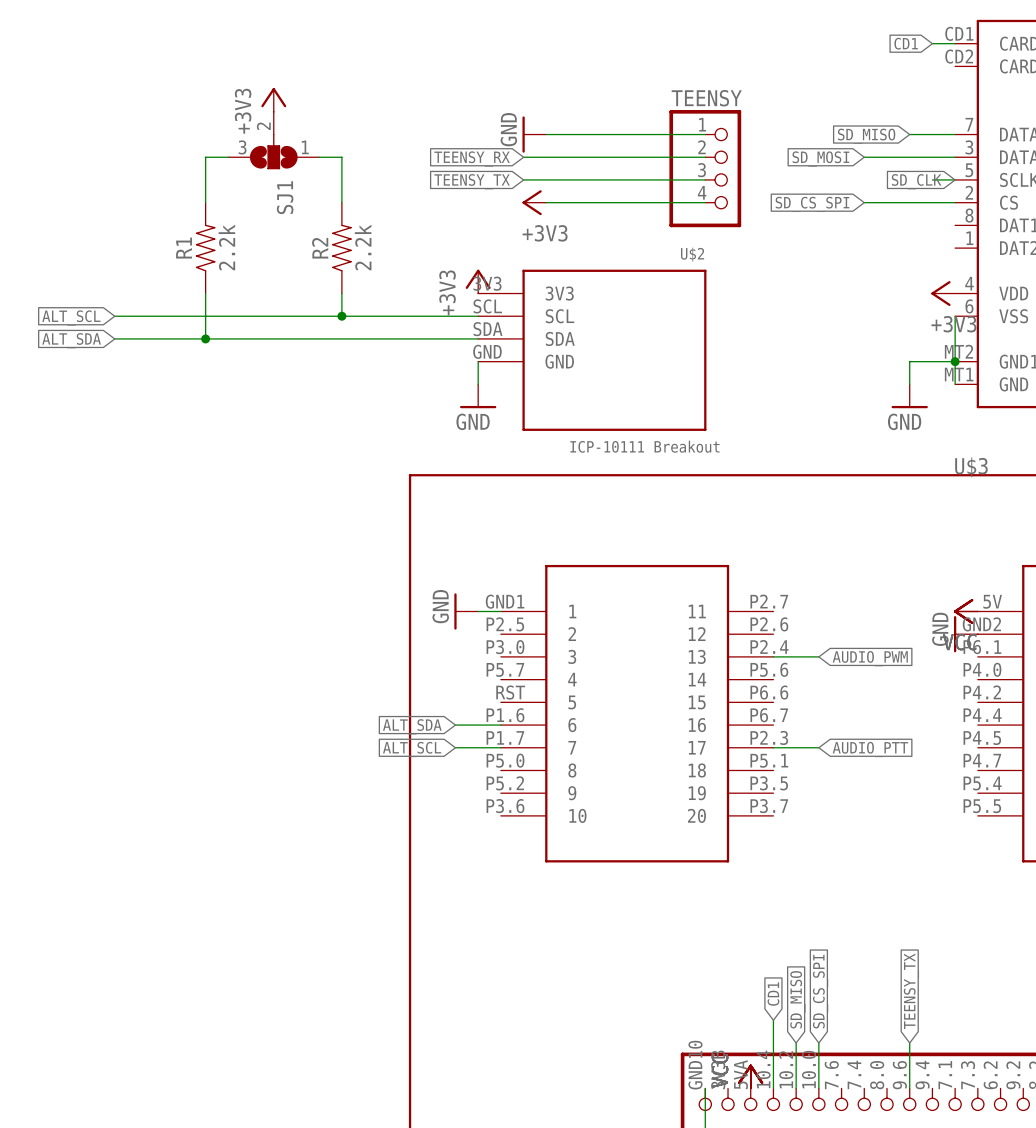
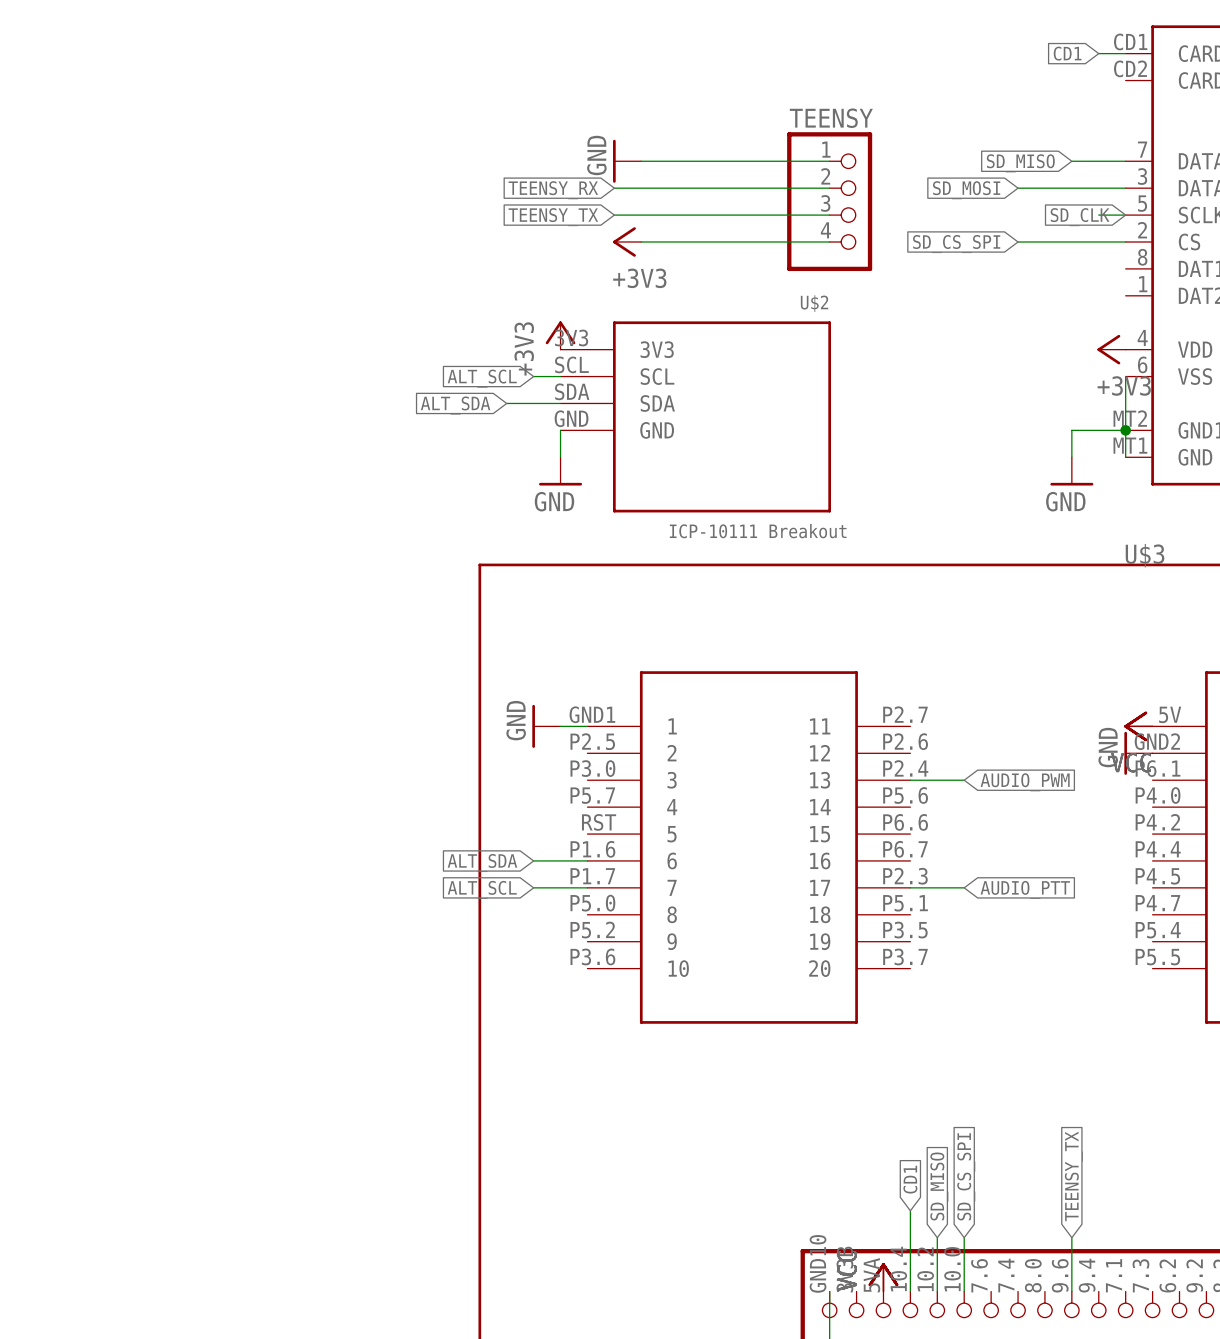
power symbol: +3V3 (273, 99) -> none
SJ1: (273, 140) -> none
wire: (228, 157) (205, 157) (205, 202) -> none
wire: (319, 157) (341, 157) (341, 202) -> none
R1: 2.2k (205, 248) -> none
R2: 2.2k (341, 248) -> none
wire: (205, 293) (205, 338) -> none
wire: (341, 293) (341, 316) -> none
wire: (114, 316) (455, 316) -> none
junction: (341, 316) -> none
global label: ALT_SCL (71, 317) -> none
global label: none -> ALT_SCL (482, 378)
wire: (114, 338) (432, 338) -> none
junction: (205, 338) -> none
global label: ALT_SDA (71, 340) -> none
global label: none -> ALT_SDA (455, 405)

